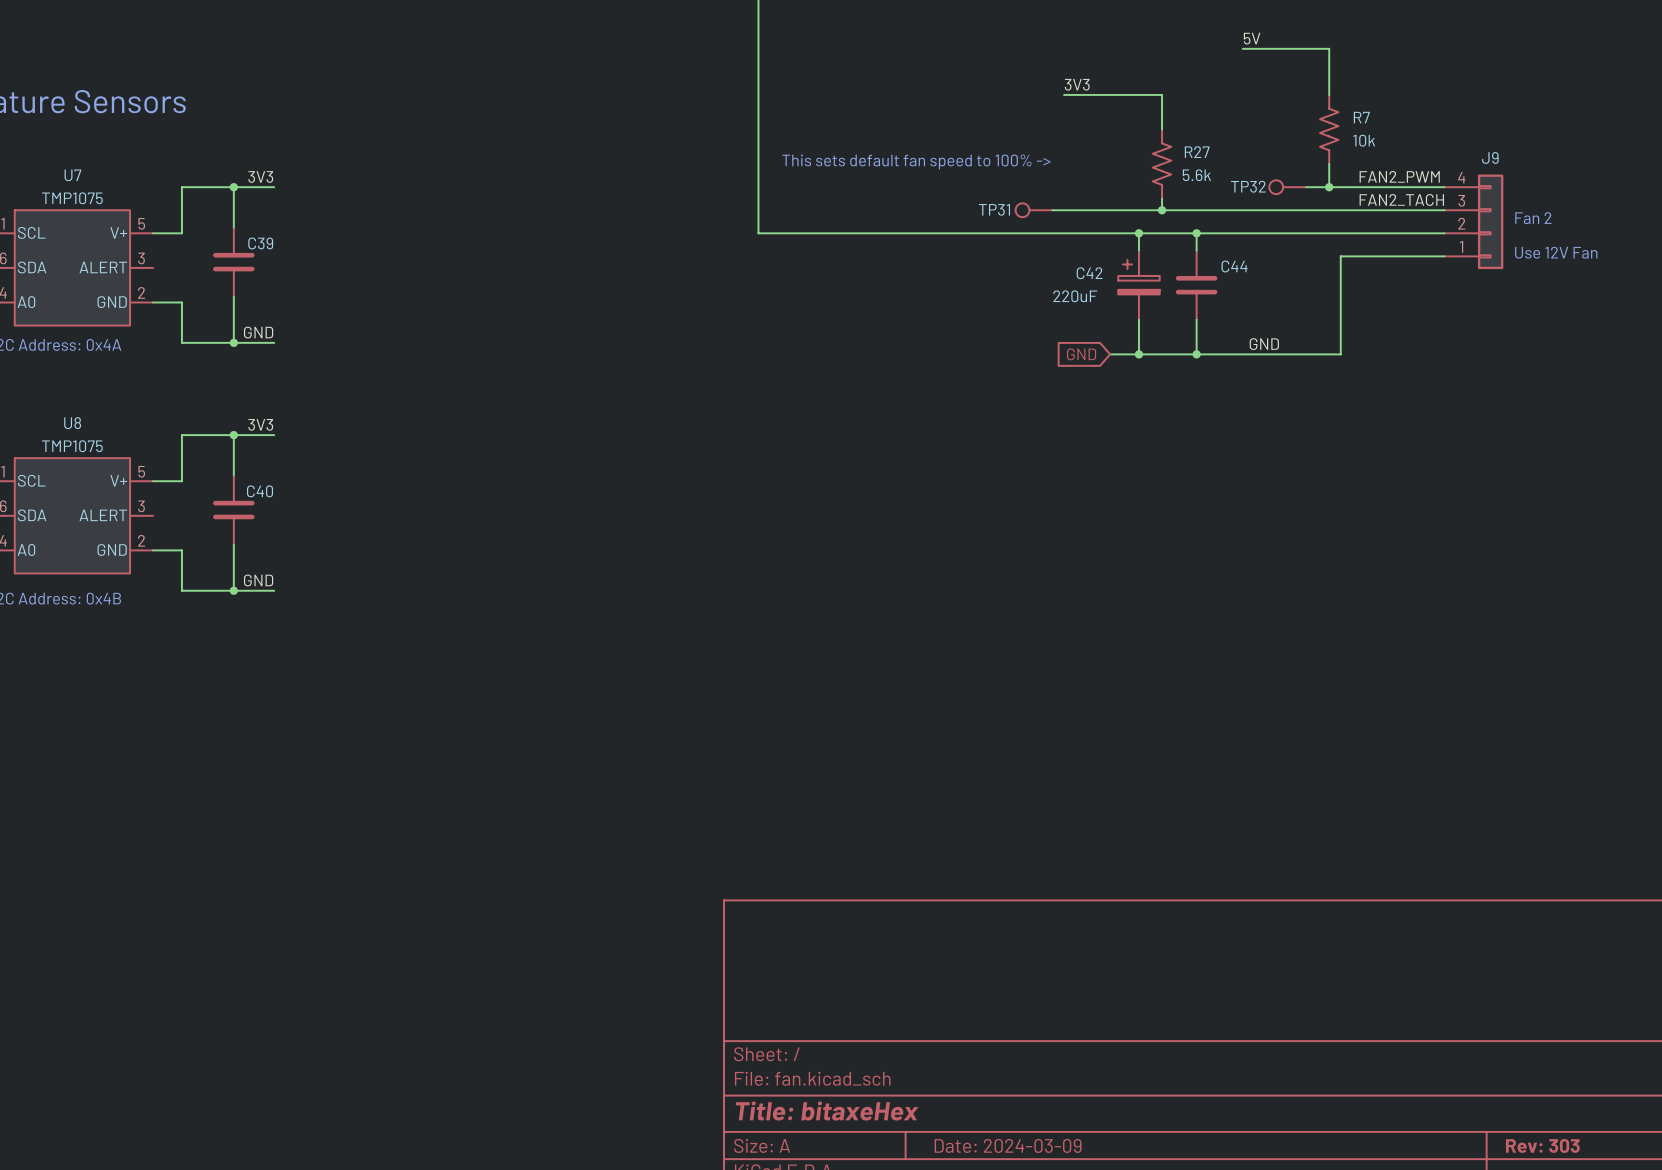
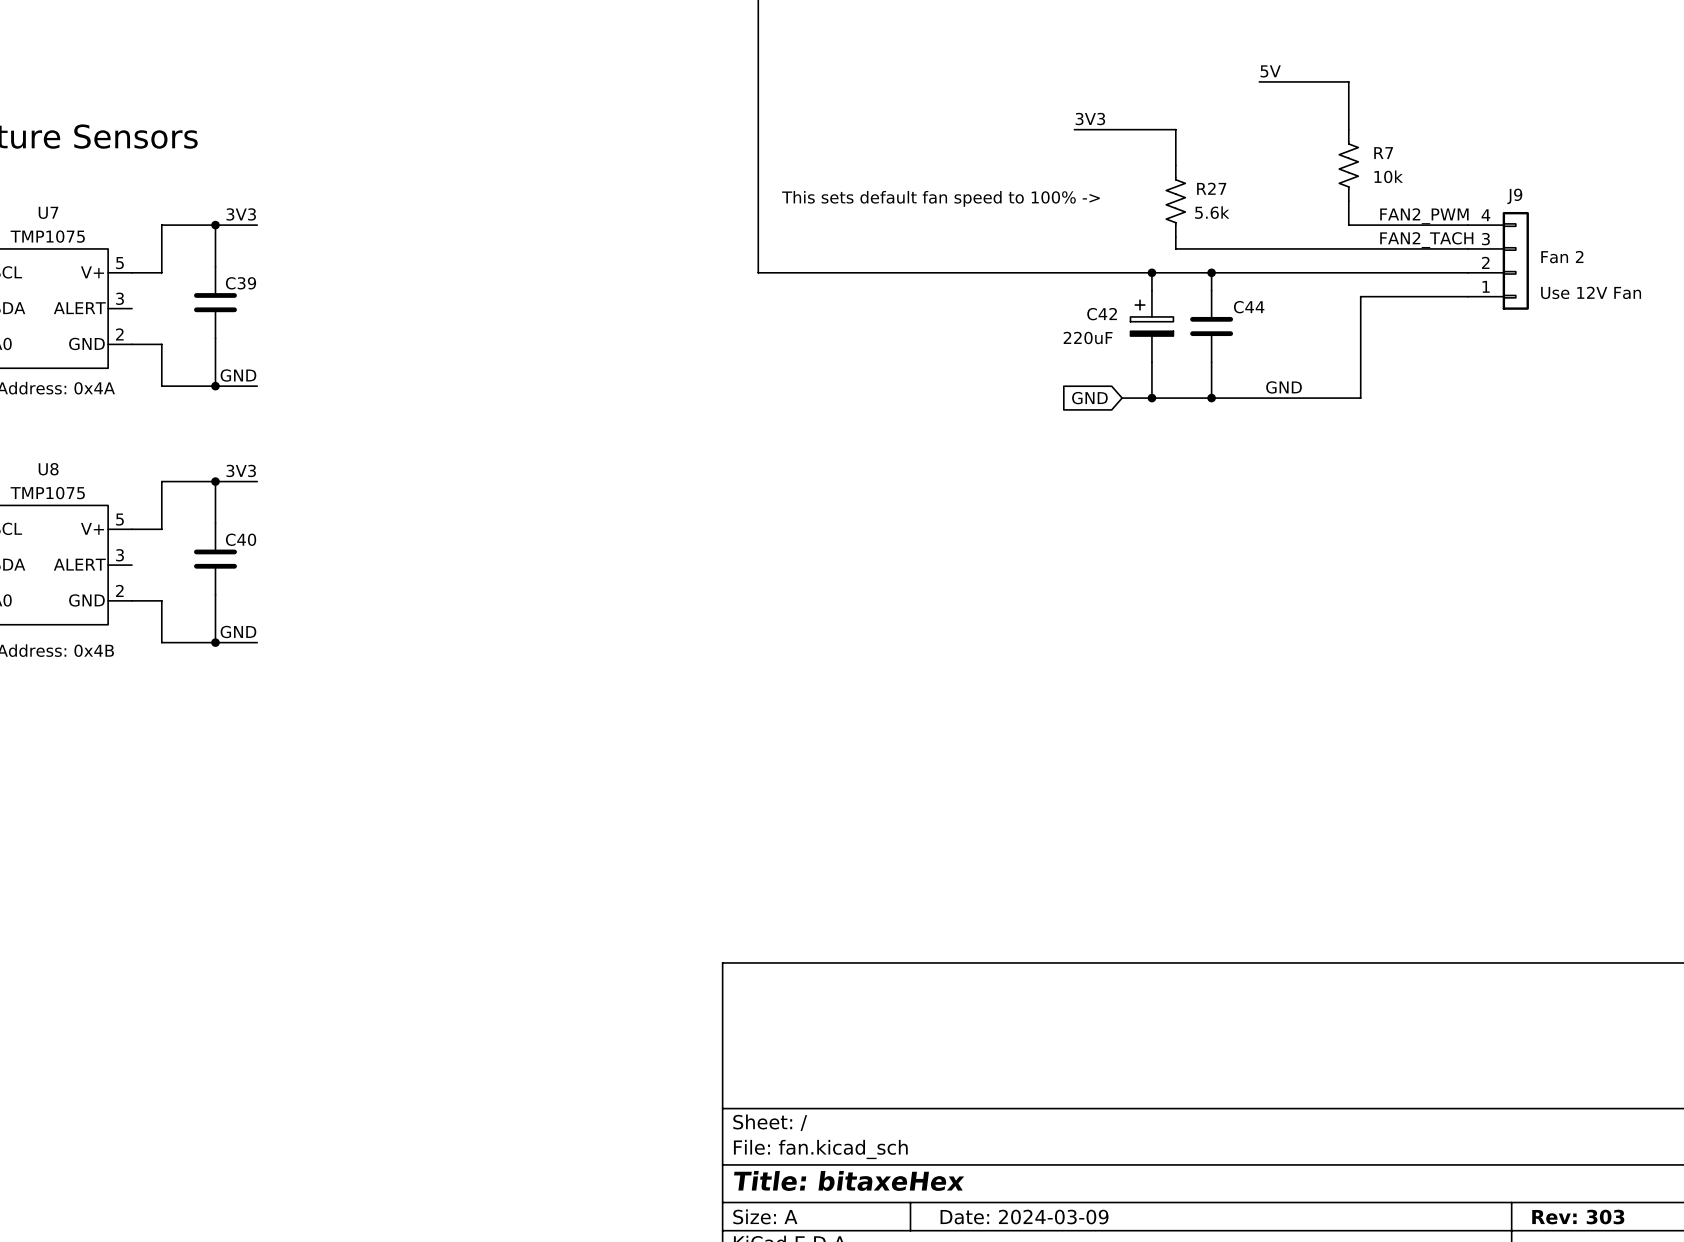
TP32: (1287, 187) -> none
wire: (1306, 187) (1329, 187) -> none
junction: (1329, 187) -> none
TP31: (1034, 210) -> none
wire: (1052, 210) (1162, 210) -> none
junction: (1162, 210) -> none

